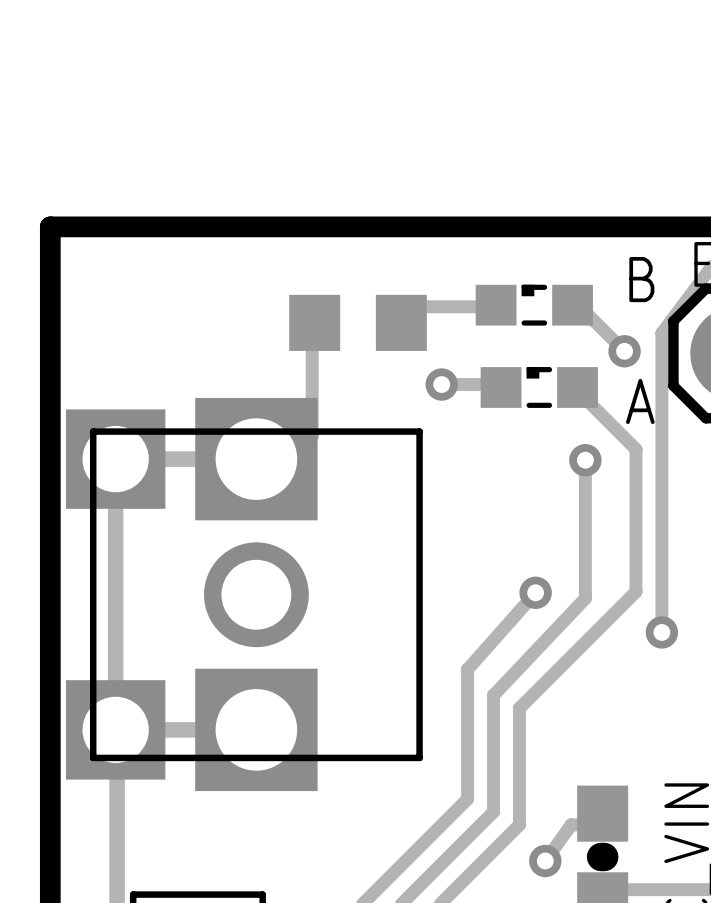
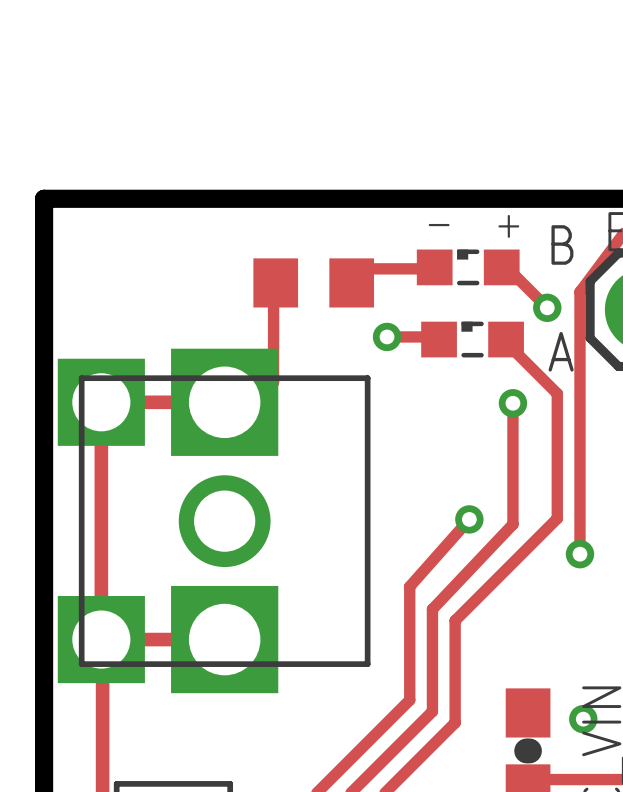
text: none -> - (439, 225)
text: none -> + (508, 226)
track: (597, 824) (571, 824) (545, 860) -> none
via position: (545, 860) -> (583, 719)

